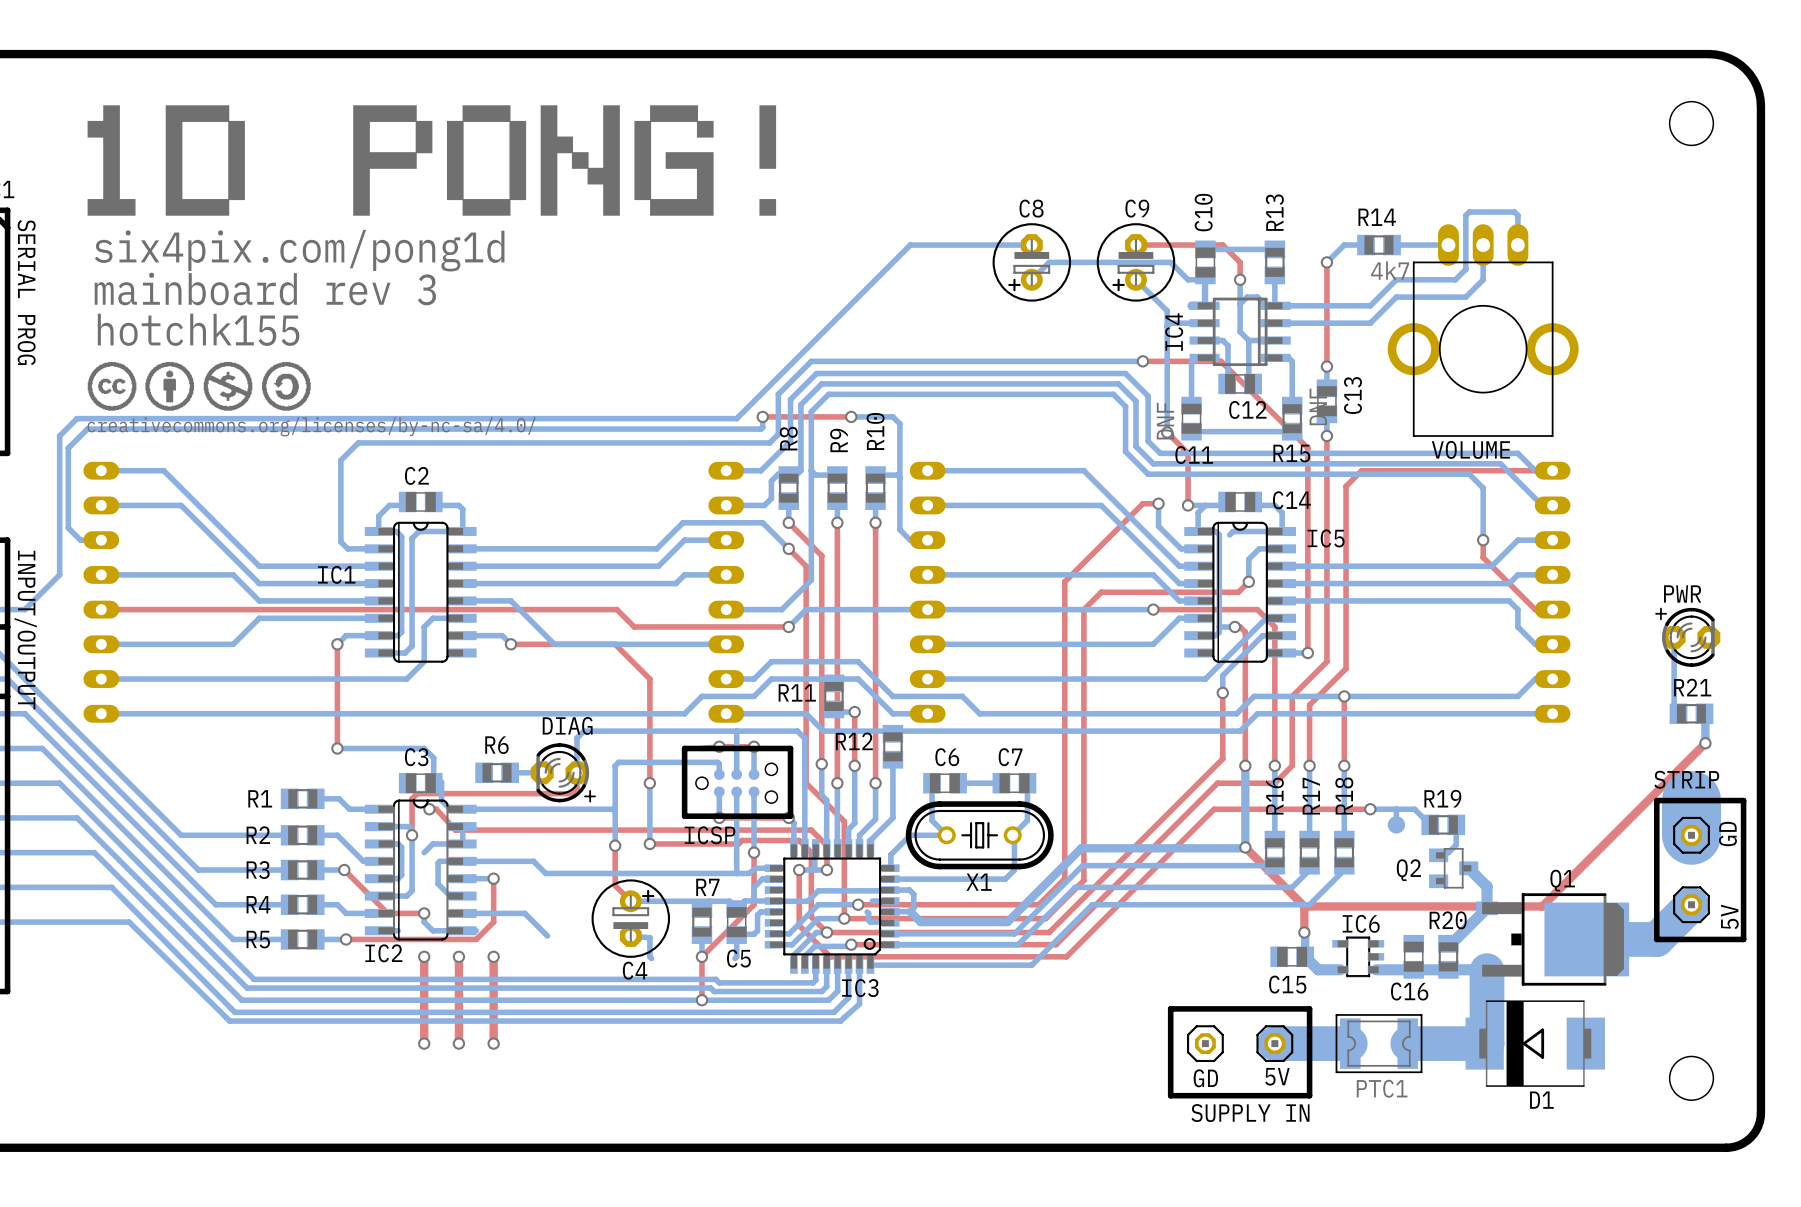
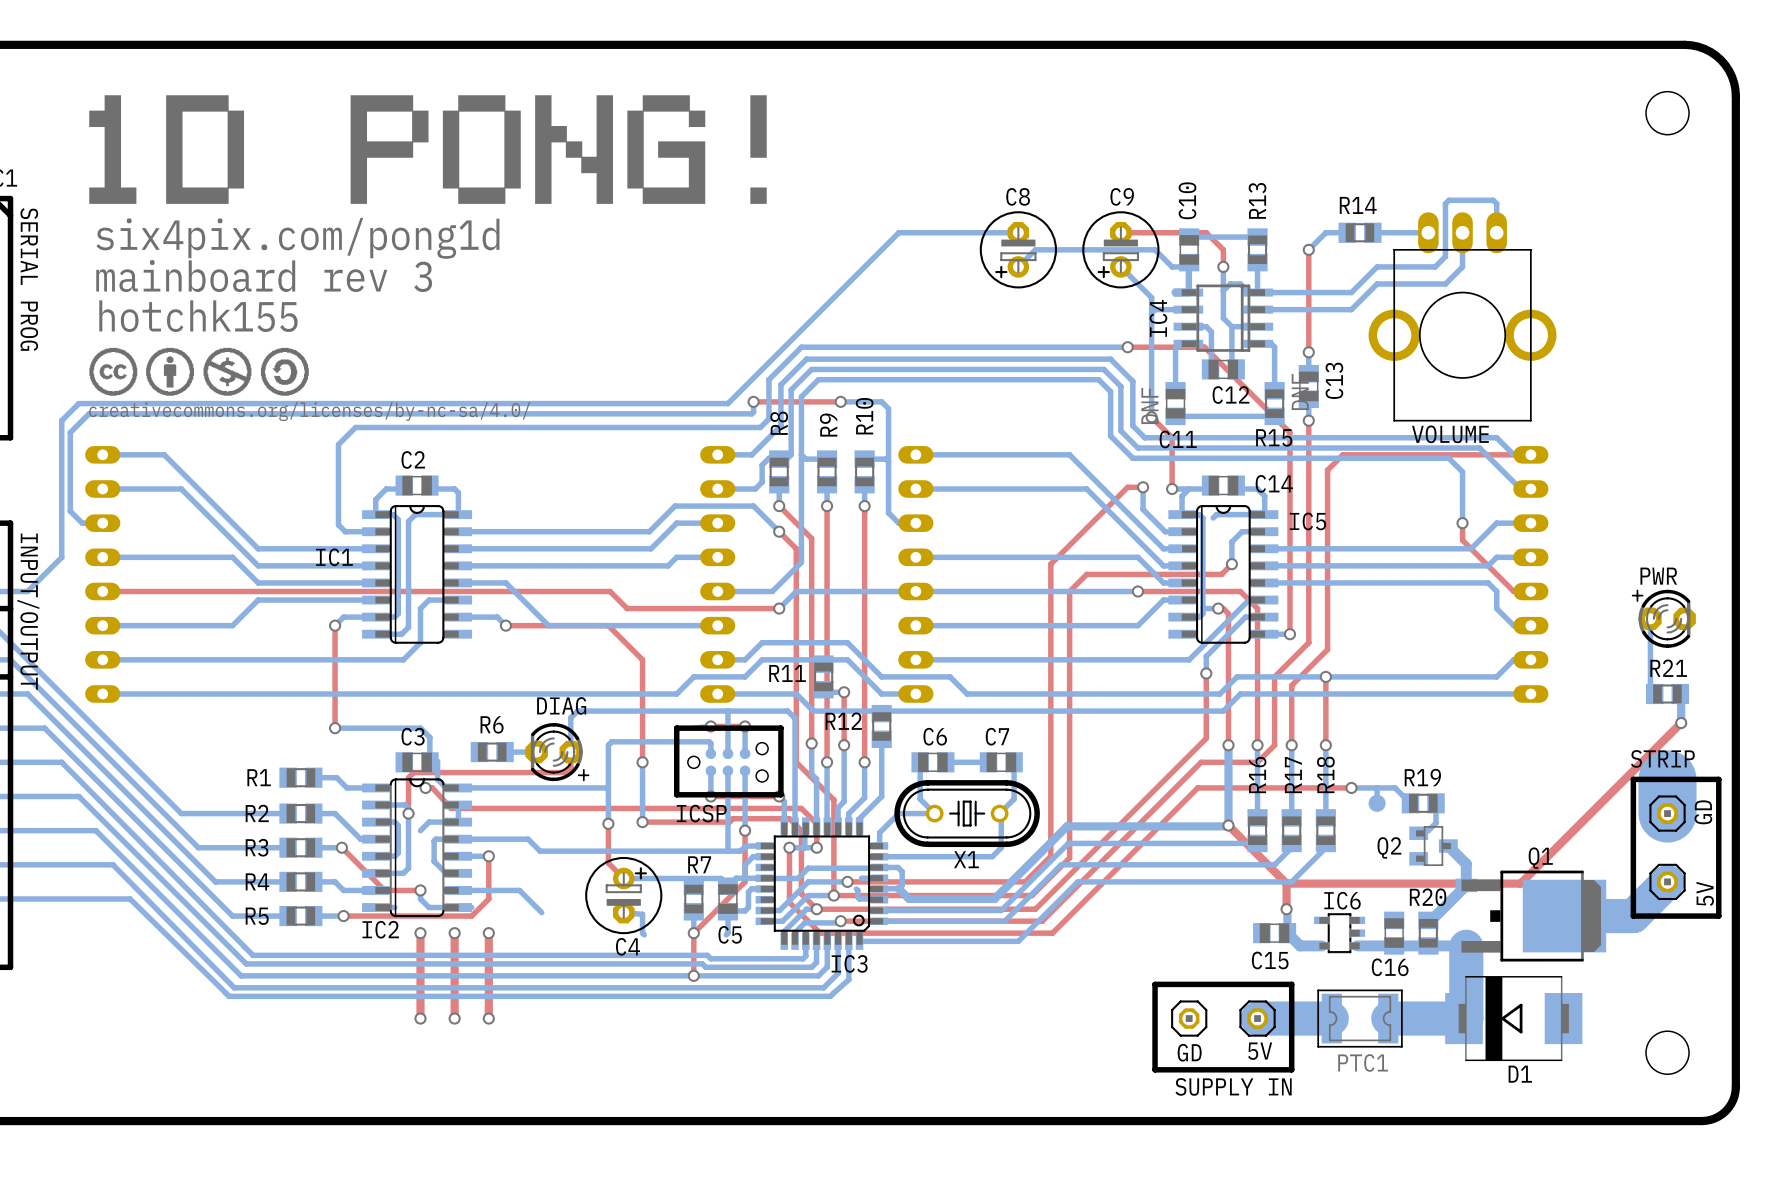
R14 value: 4k7 (1390, 270) -> none

